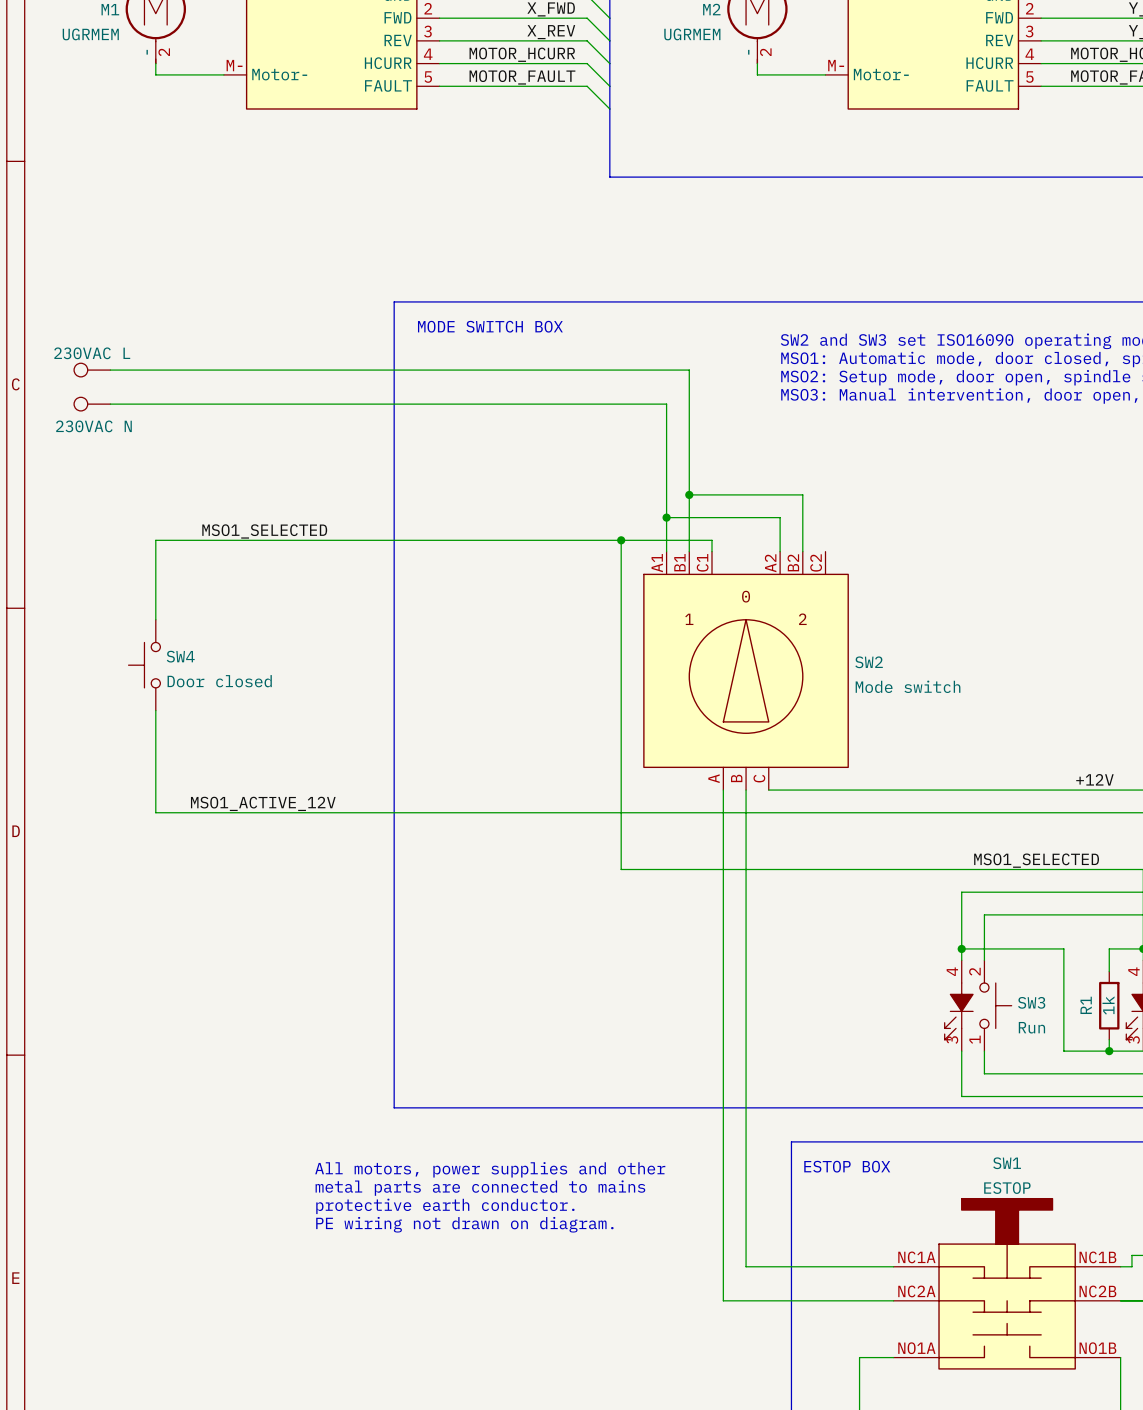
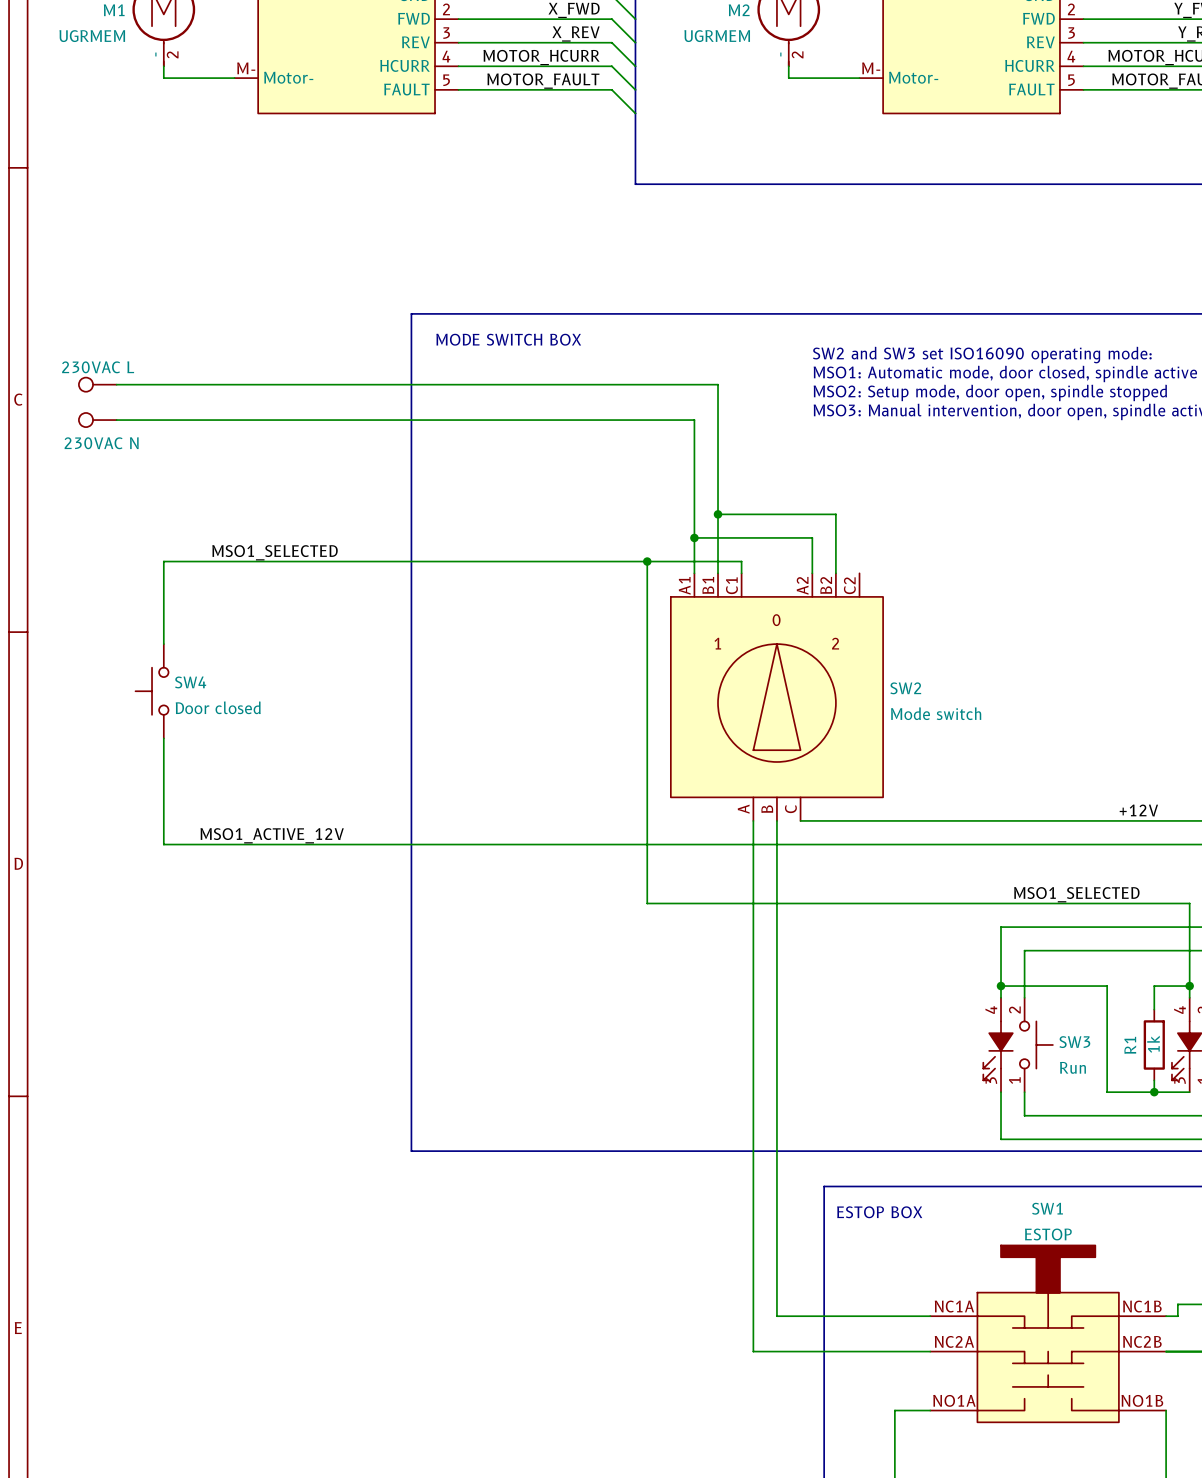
text: All motors, power supplies and other (490, 1169) -> none
text: metal parts are connected to mains (480, 1188) -> none
text: protective earth conductor. (445, 1206) -> none
text: PE wiring not drawn on diagram. (464, 1224) -> none

